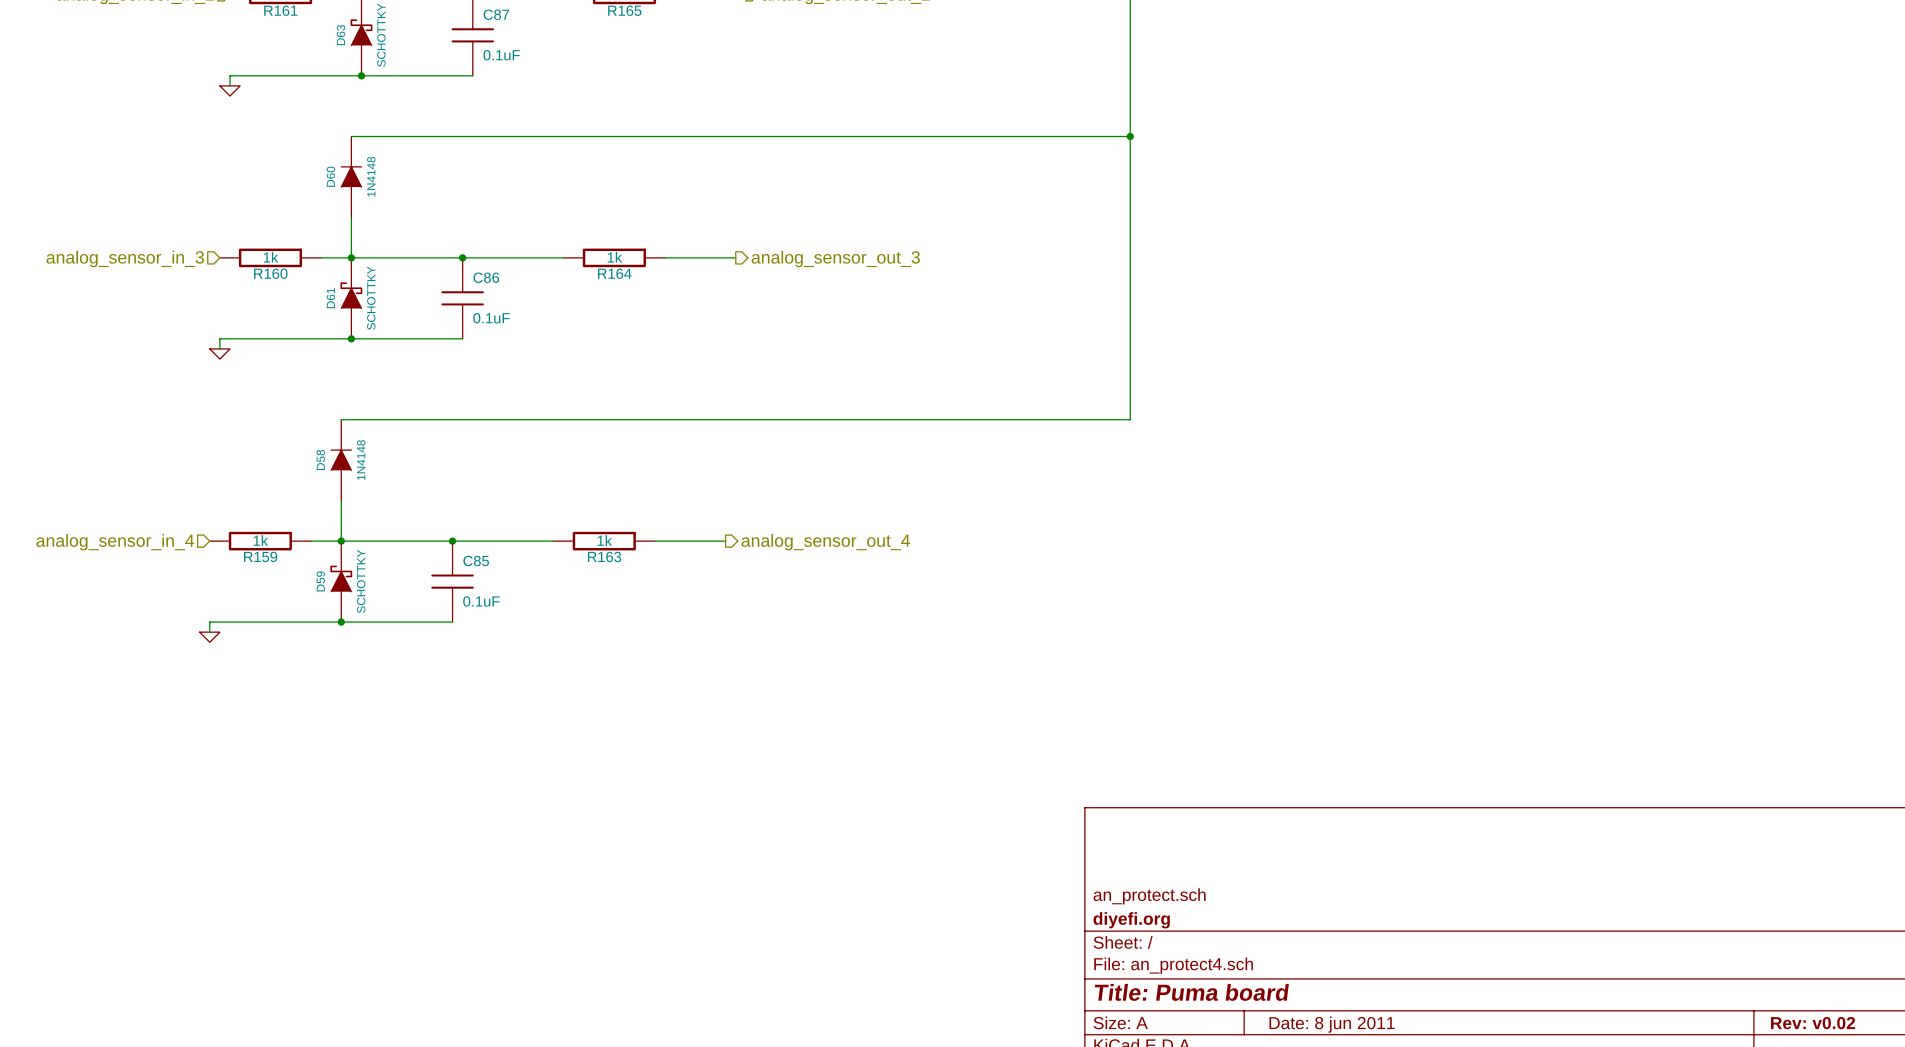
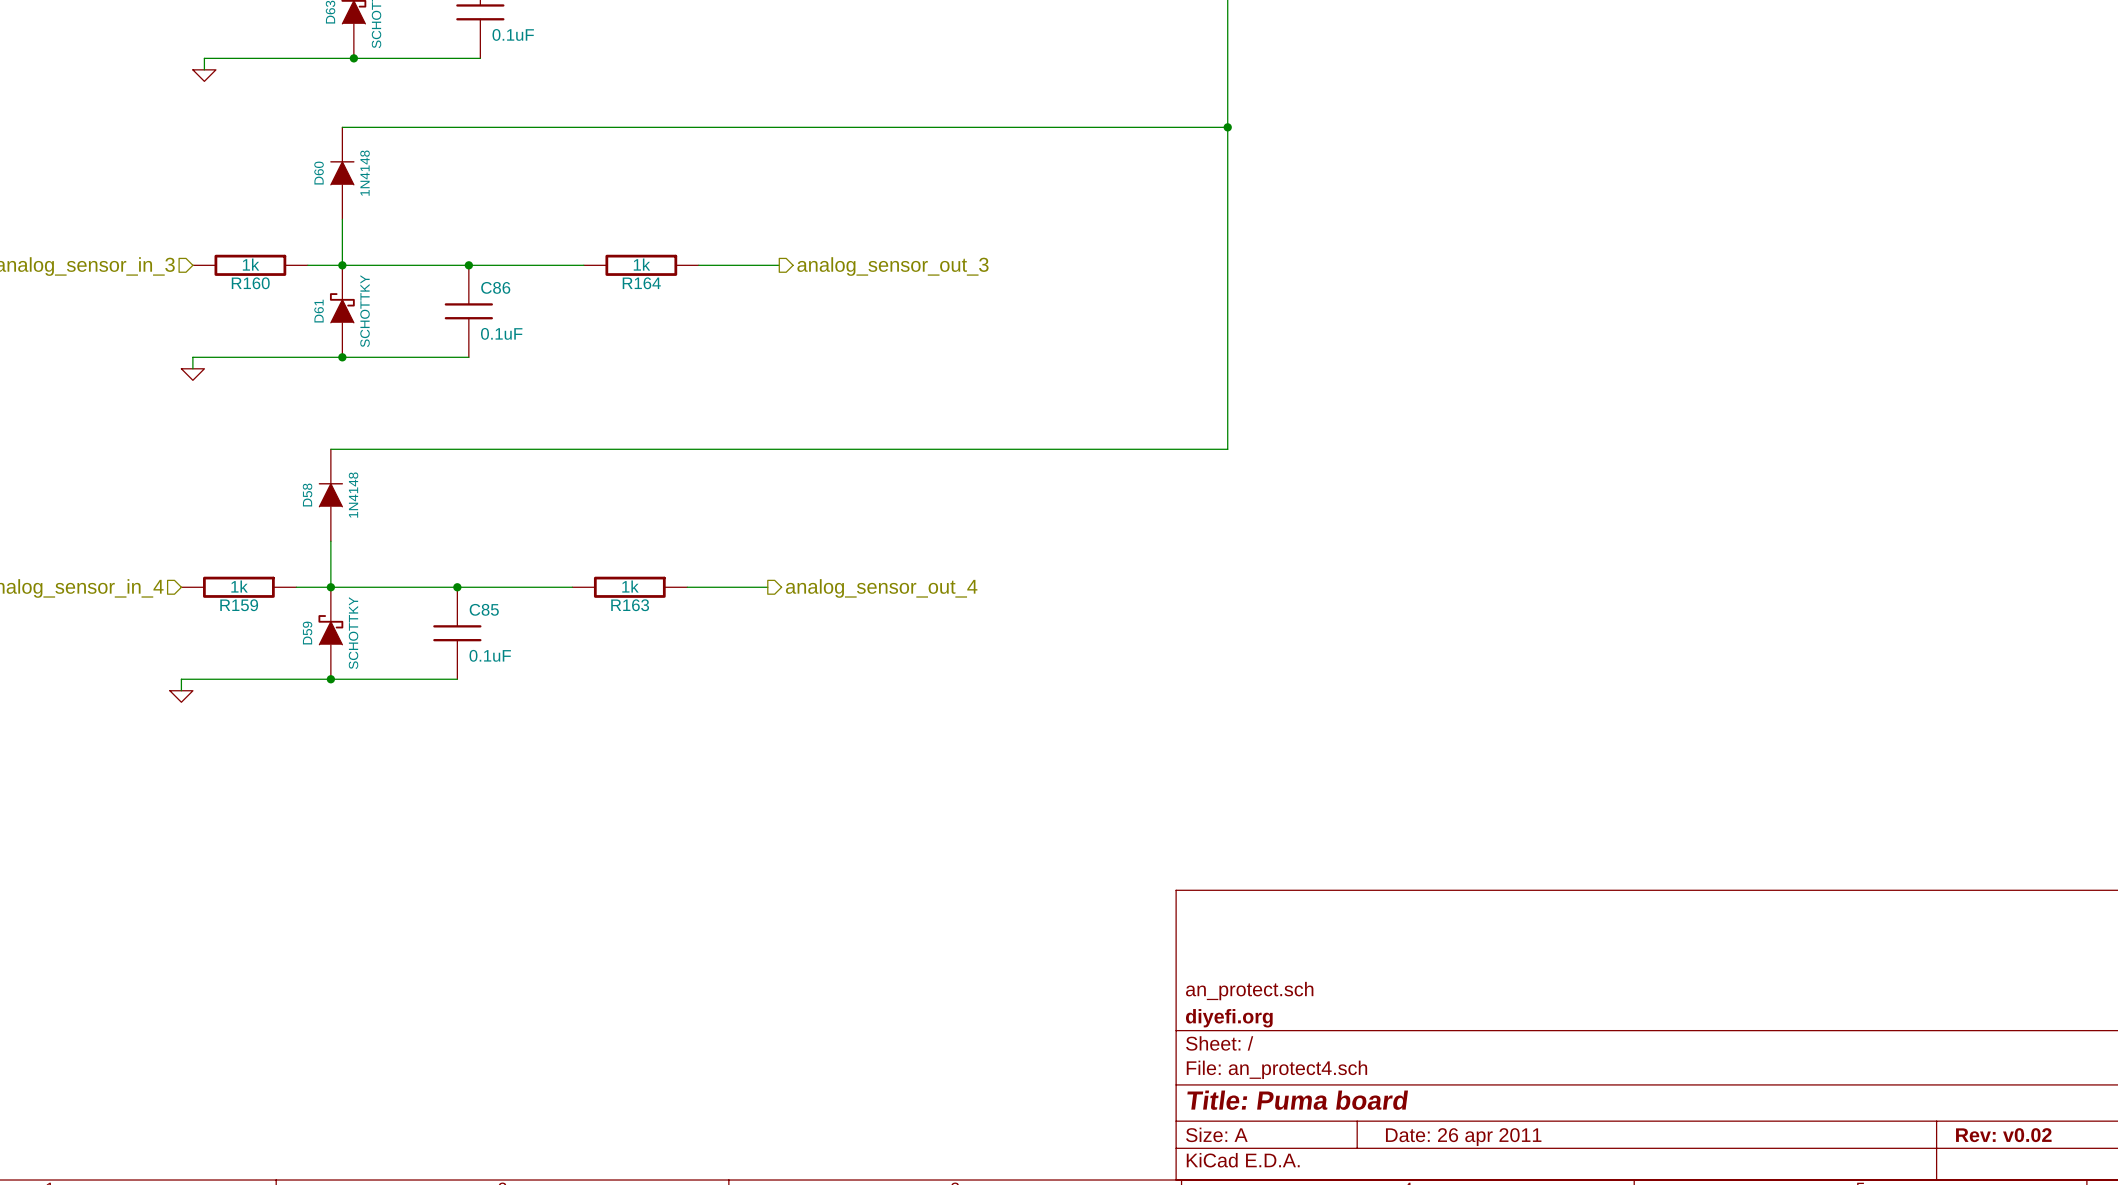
title block: Date: 8 jun 2011 (1332, 1024) -> Date: 26 apr 2011 (1463, 1137)

